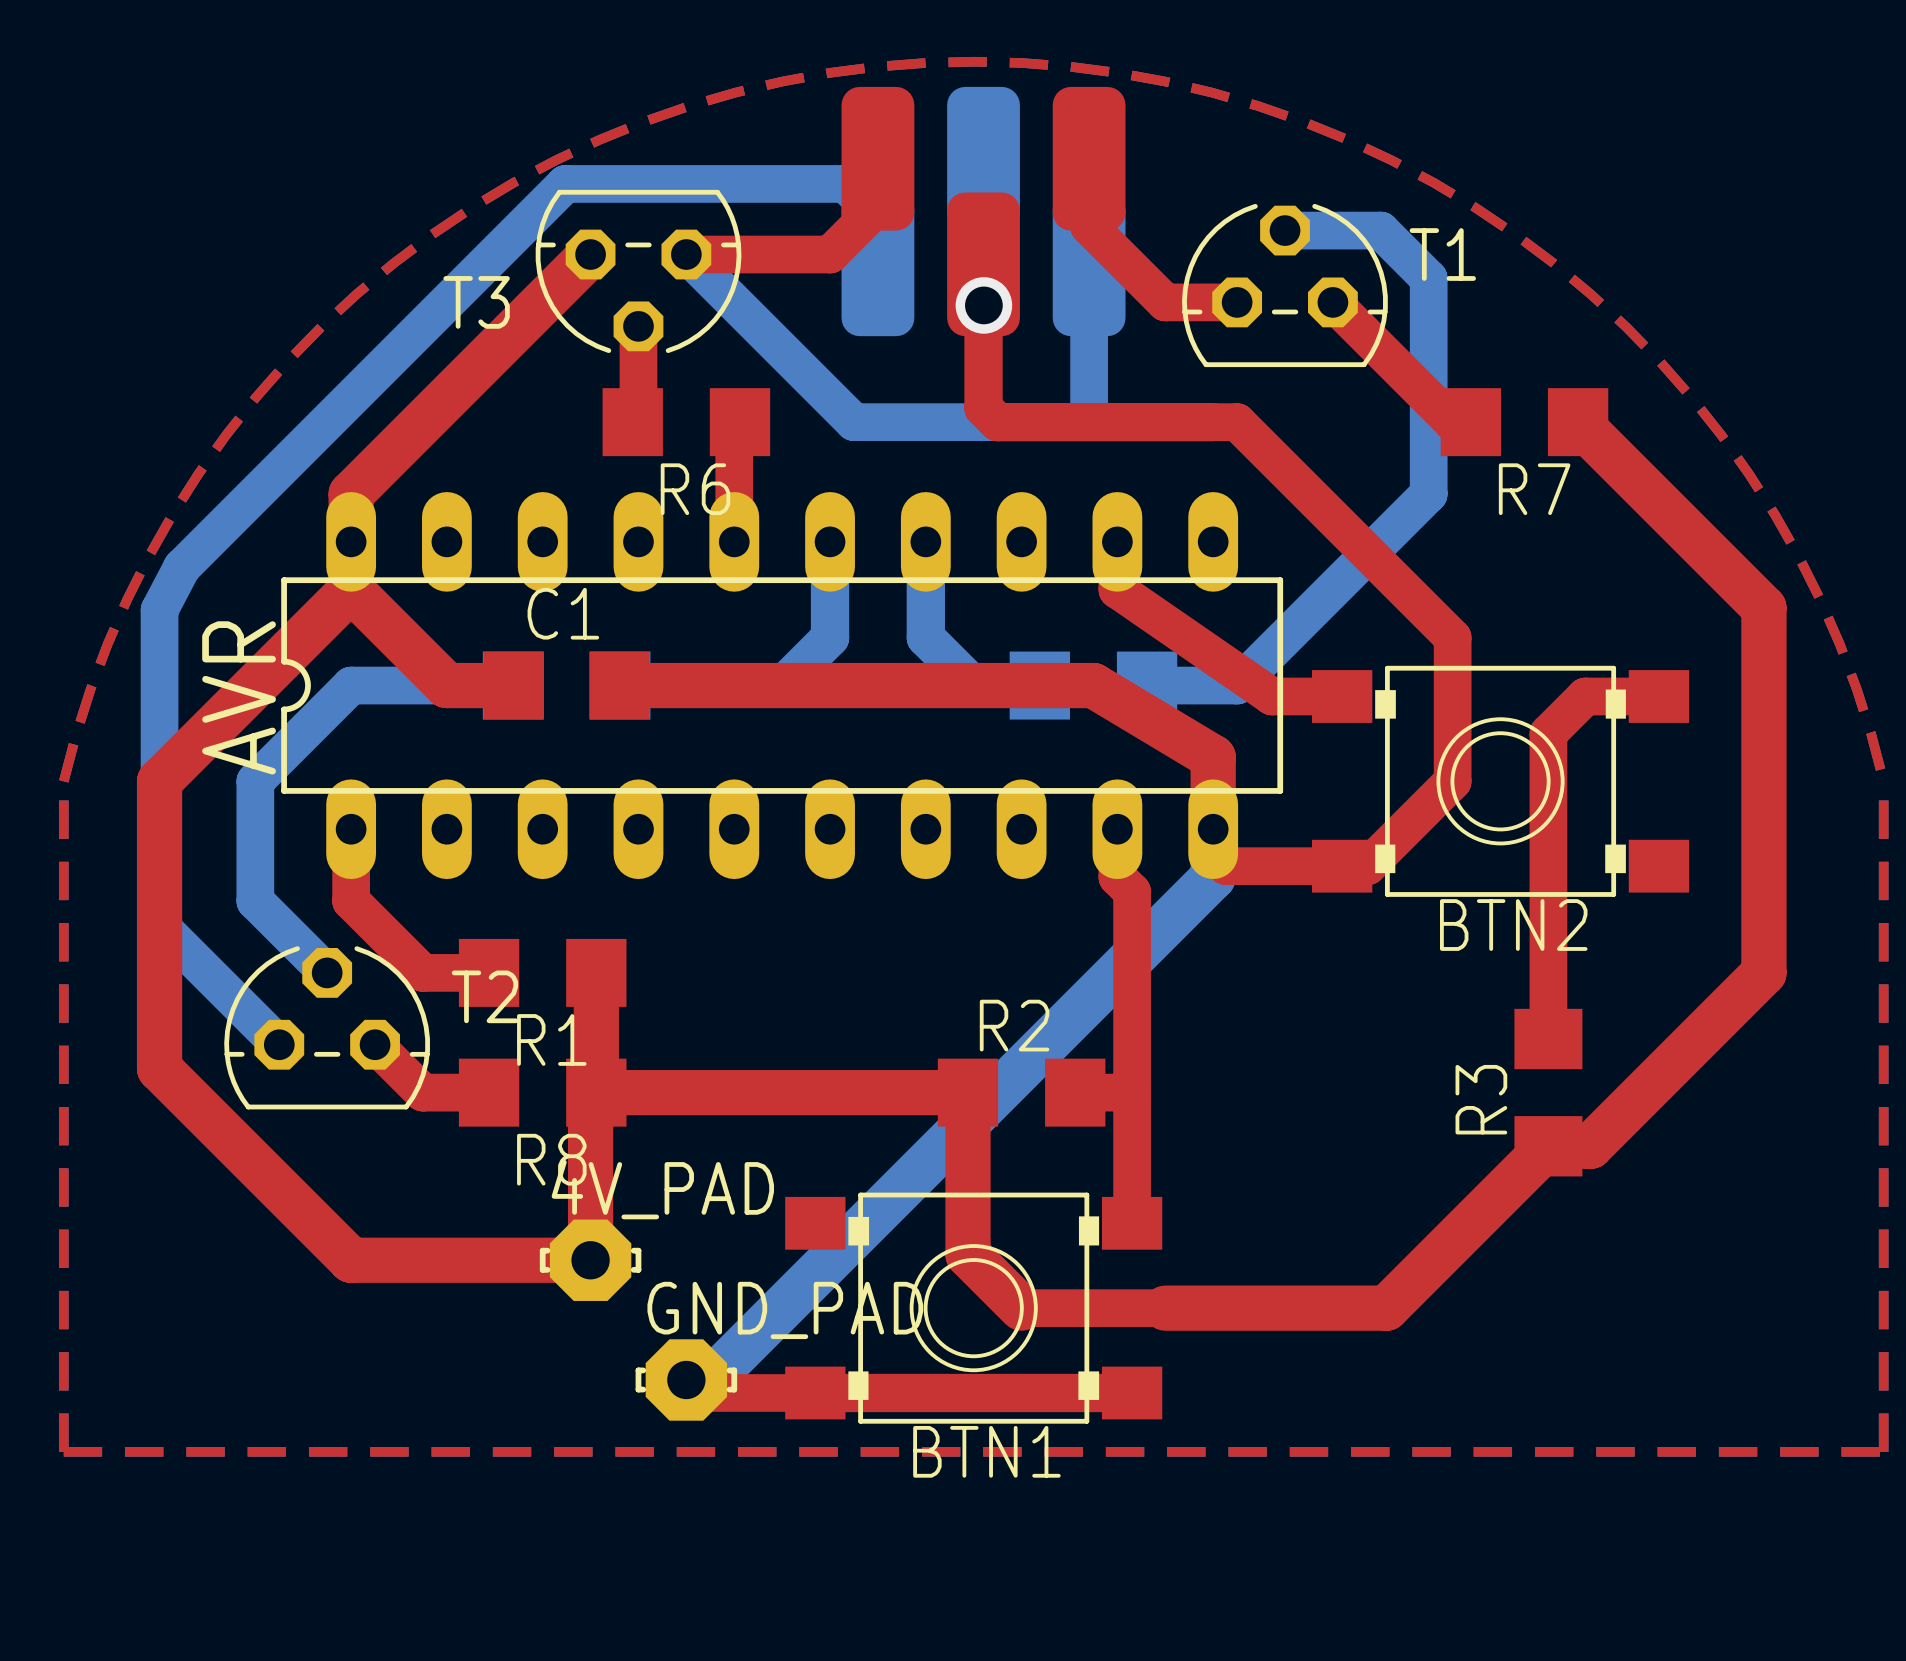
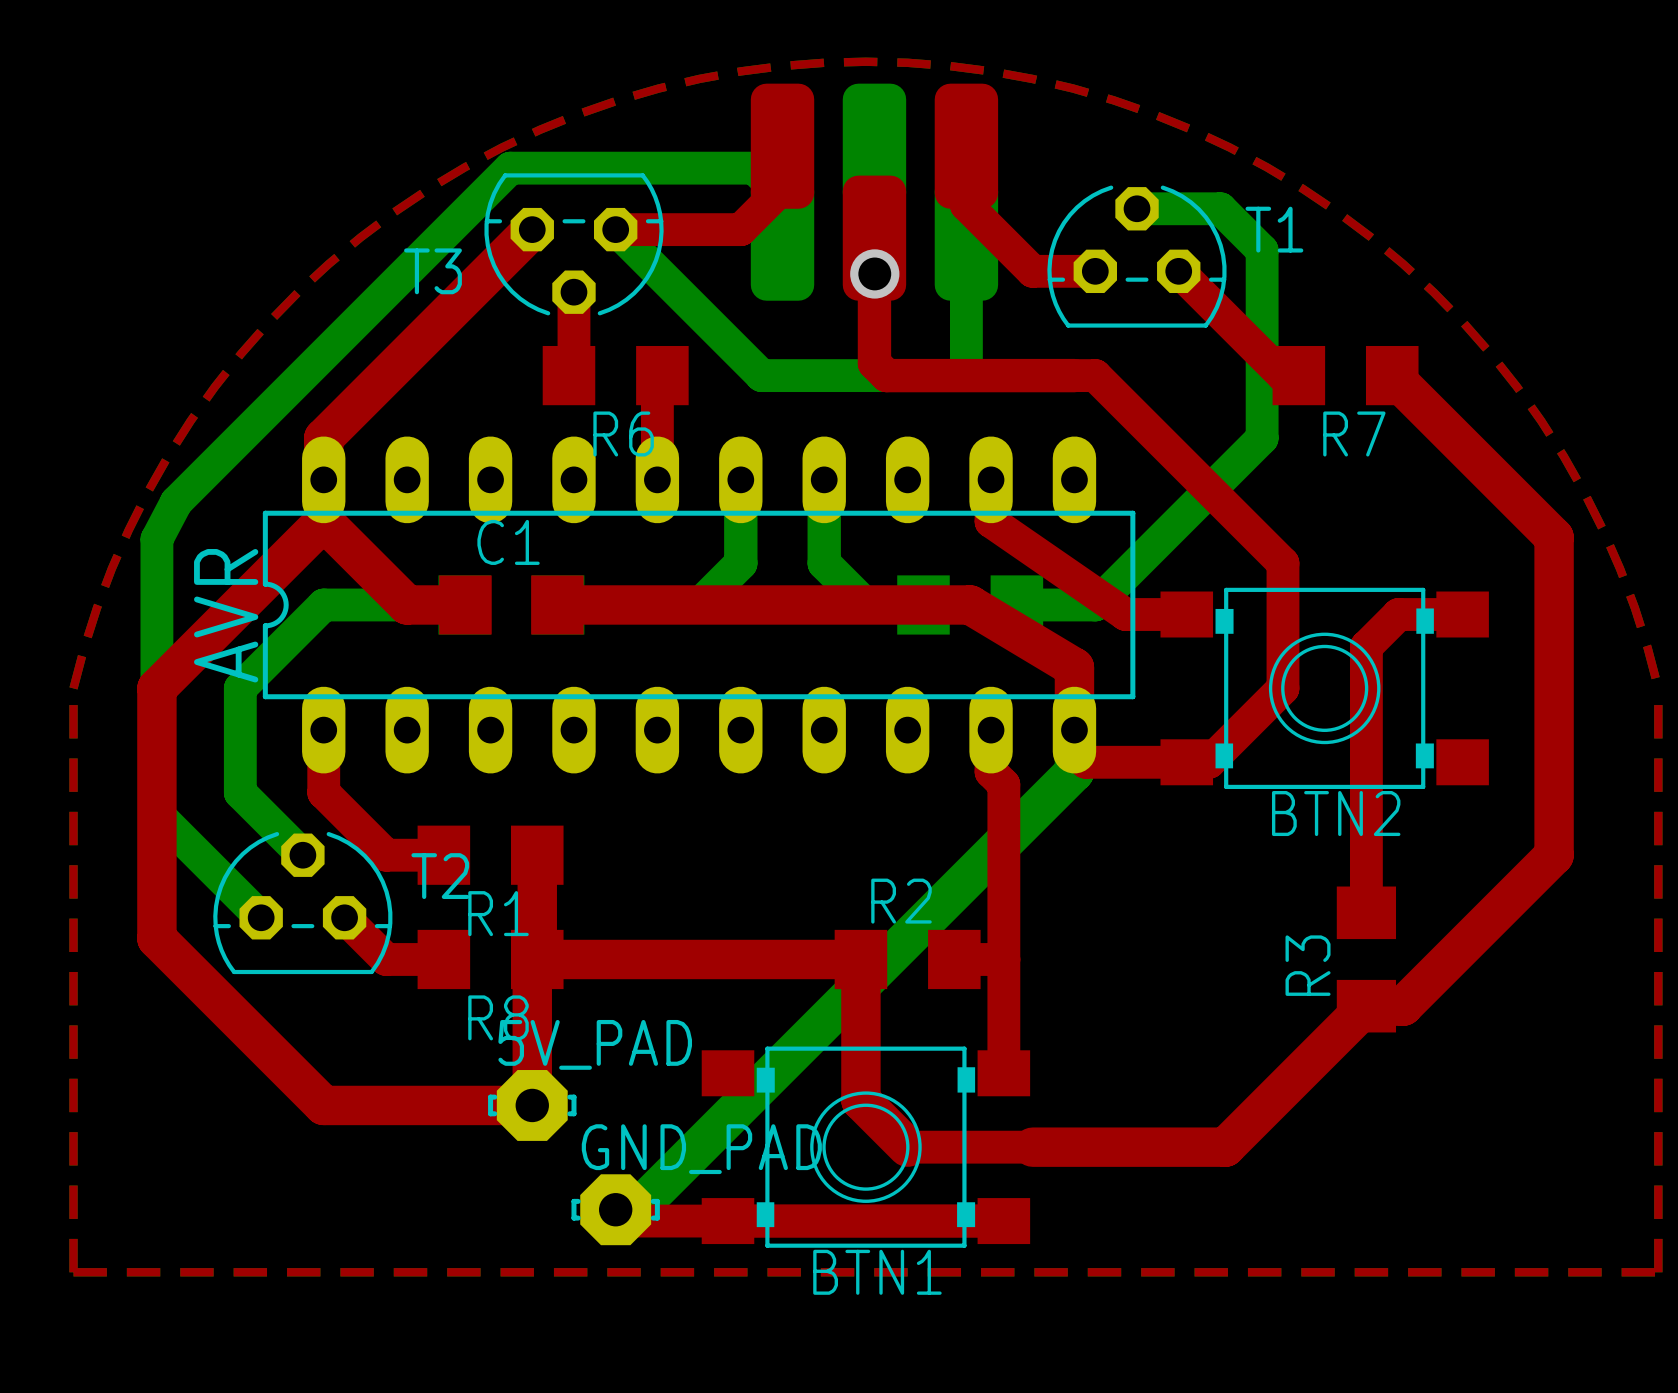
4V_PAD name: 4V_PAD (662, 1189) -> 5V_PAD (595, 1044)

